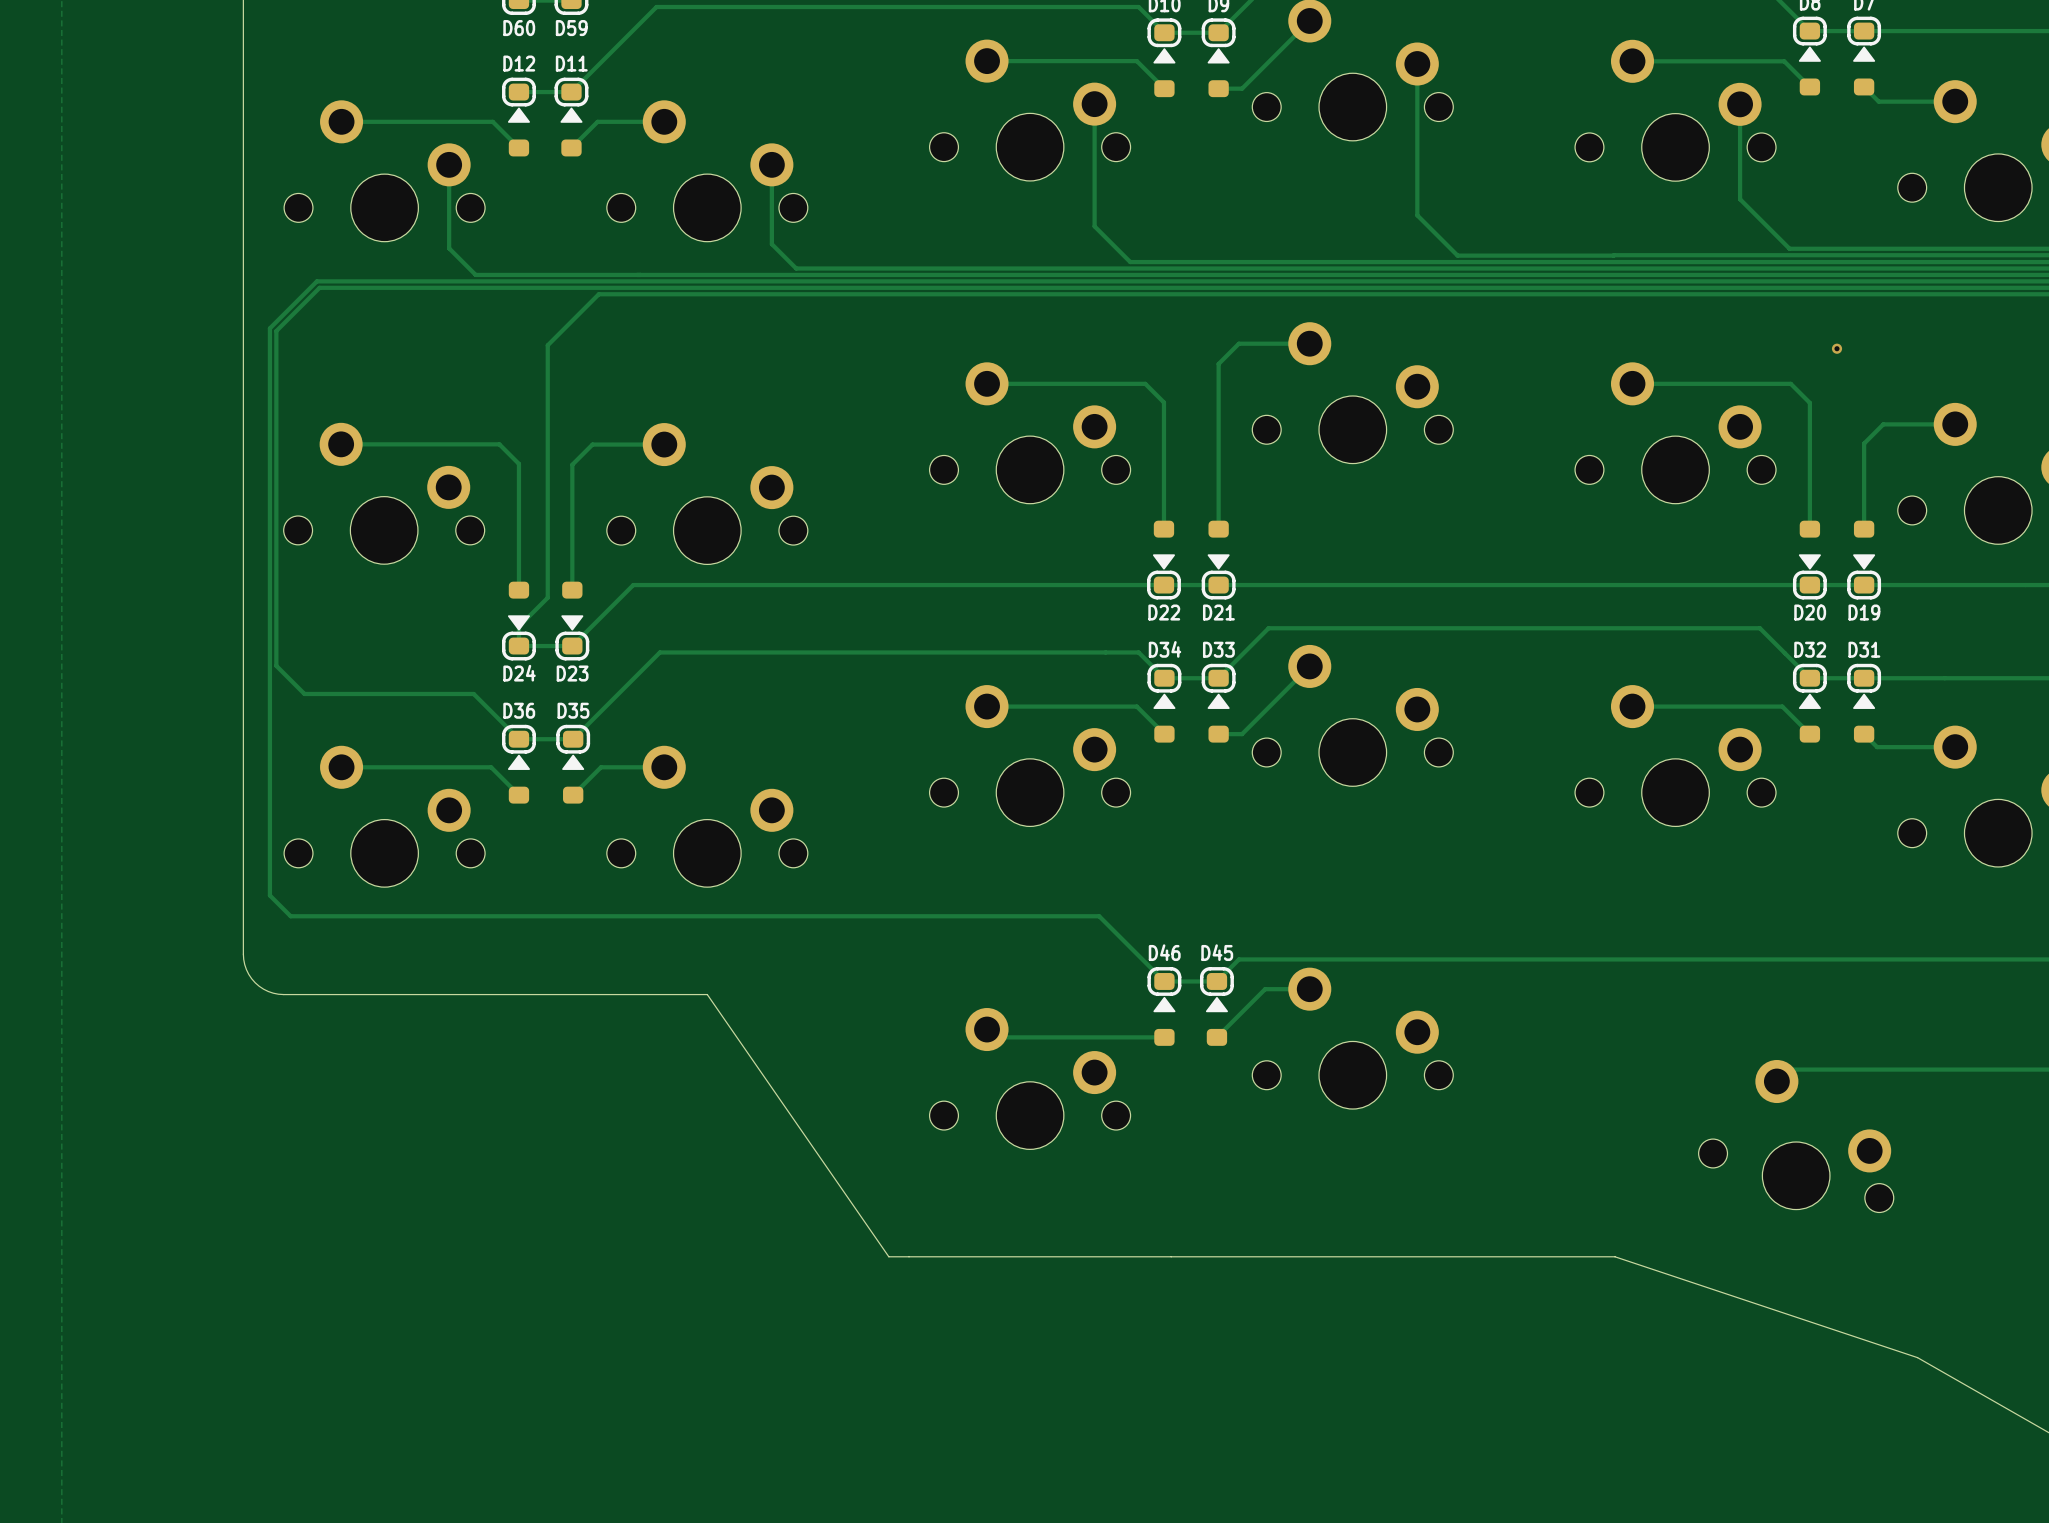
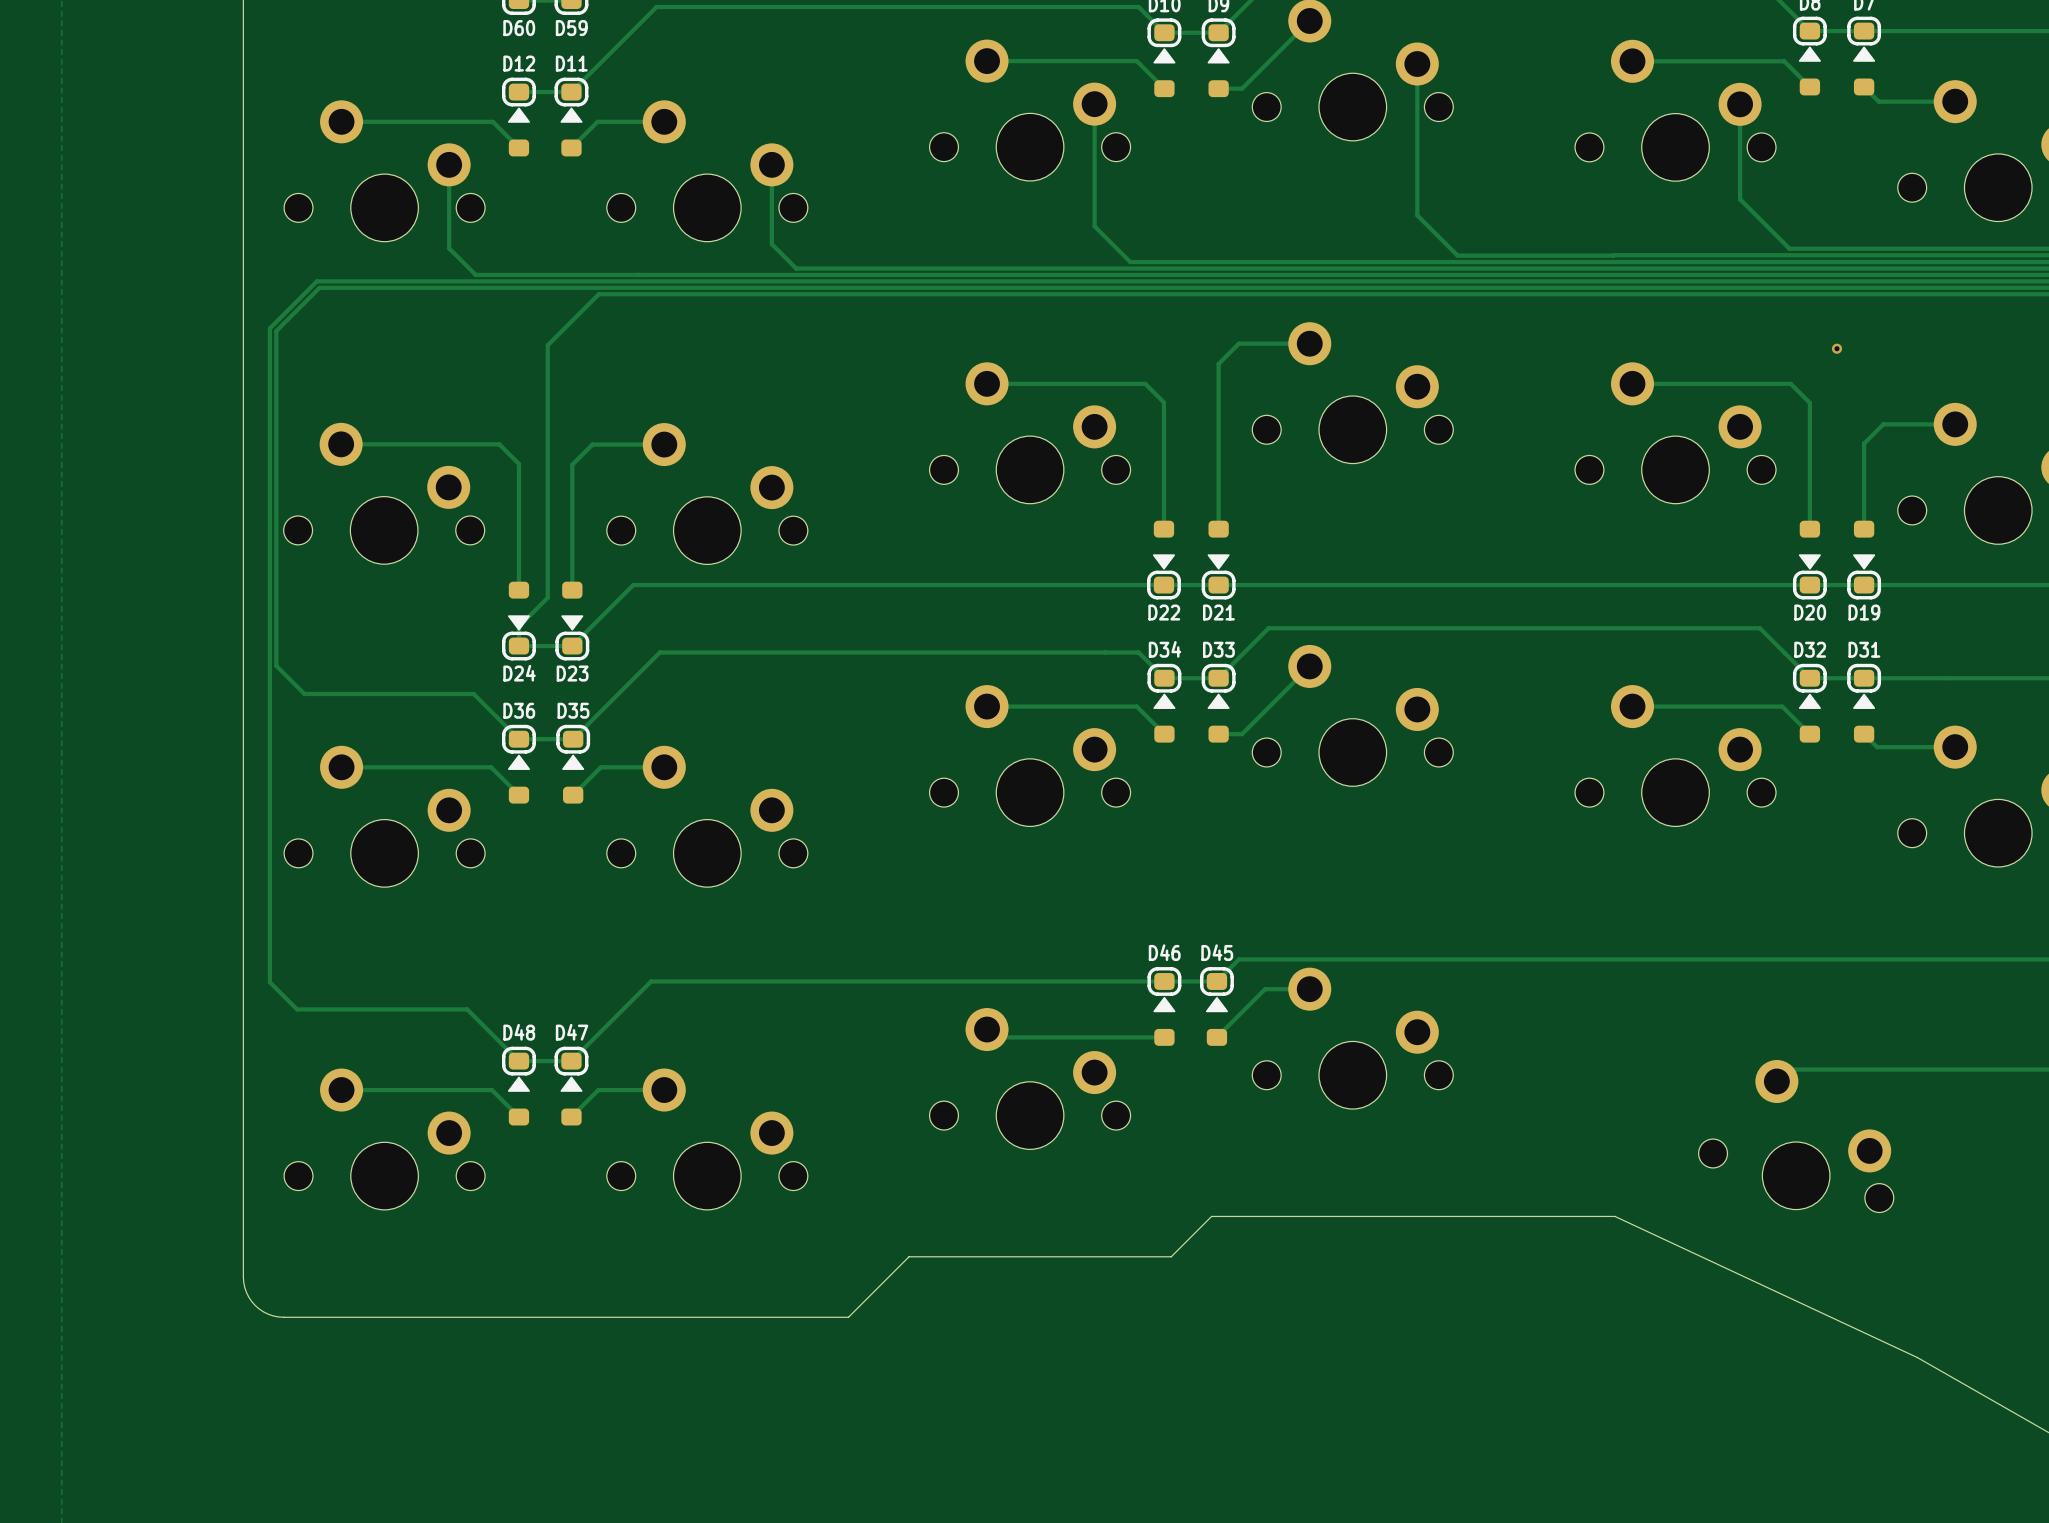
track: (269, 895) (290, 916) (1099, 916) (1164, 981) -> (269, 895) (269, 982) (297, 1009) (467, 1009) (518, 1061) (571, 1061) (651, 981) (1164, 981)
board edge: (243, 954) (244, 964) (251, 978) (263, 989) (278, 994) (707, 994) (888, 1256) (909, 1256) -> (243, 954) (243, 1282) (251, 1301) (268, 1314) (283, 1317) (848, 1317) (909, 1256)
D48: none -> (518, 1086)
D47: none -> (571, 1086)
track: none -> (341, 1090) (491, 1090) (518, 1117)
track: none -> (664, 1090) (598, 1090) (571, 1117)
part: none -> (384, 1139)
part: none -> (707, 1139)
board edge: (1171, 1256) (1614, 1256) (1917, 1357) -> (1171, 1256) (1211, 1216) (1614, 1216) (1917, 1357)

